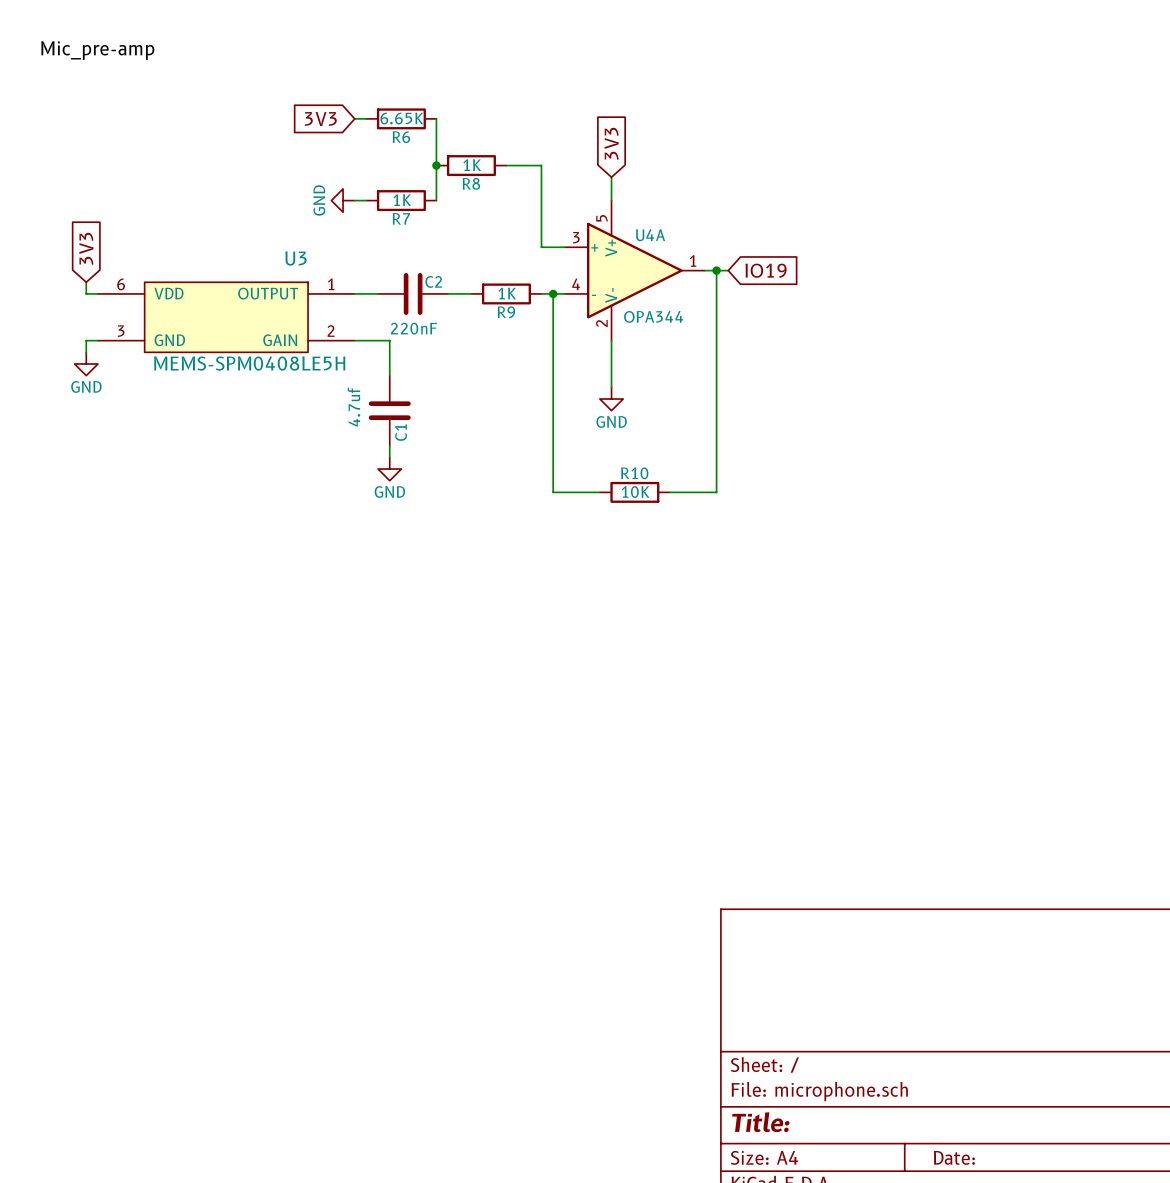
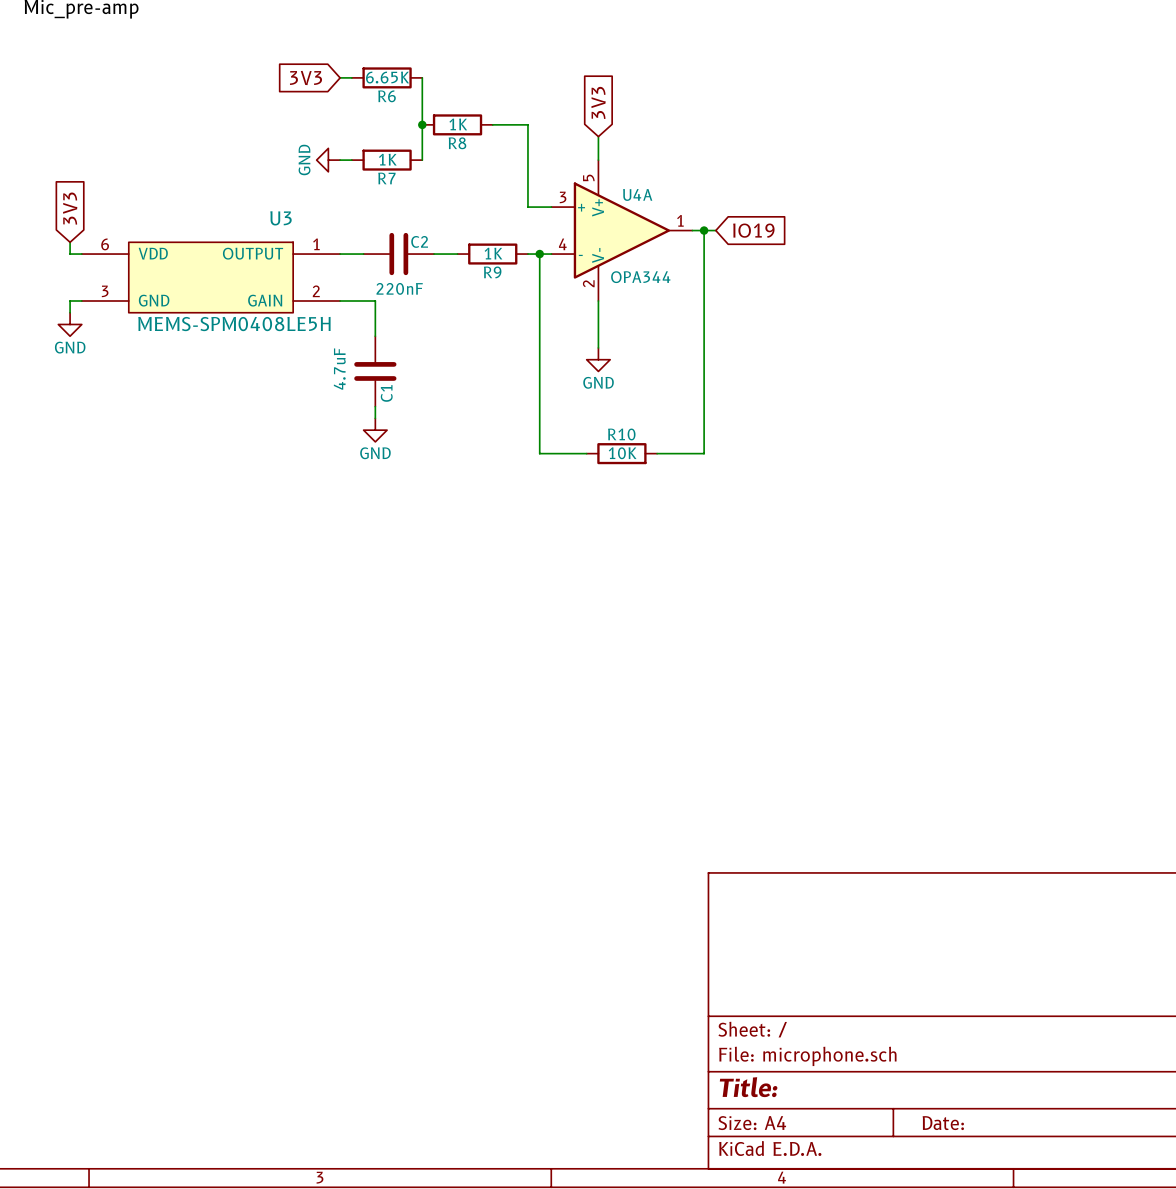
C1 value: 4.7uf (353, 406) -> 4.7uF (339, 369)

